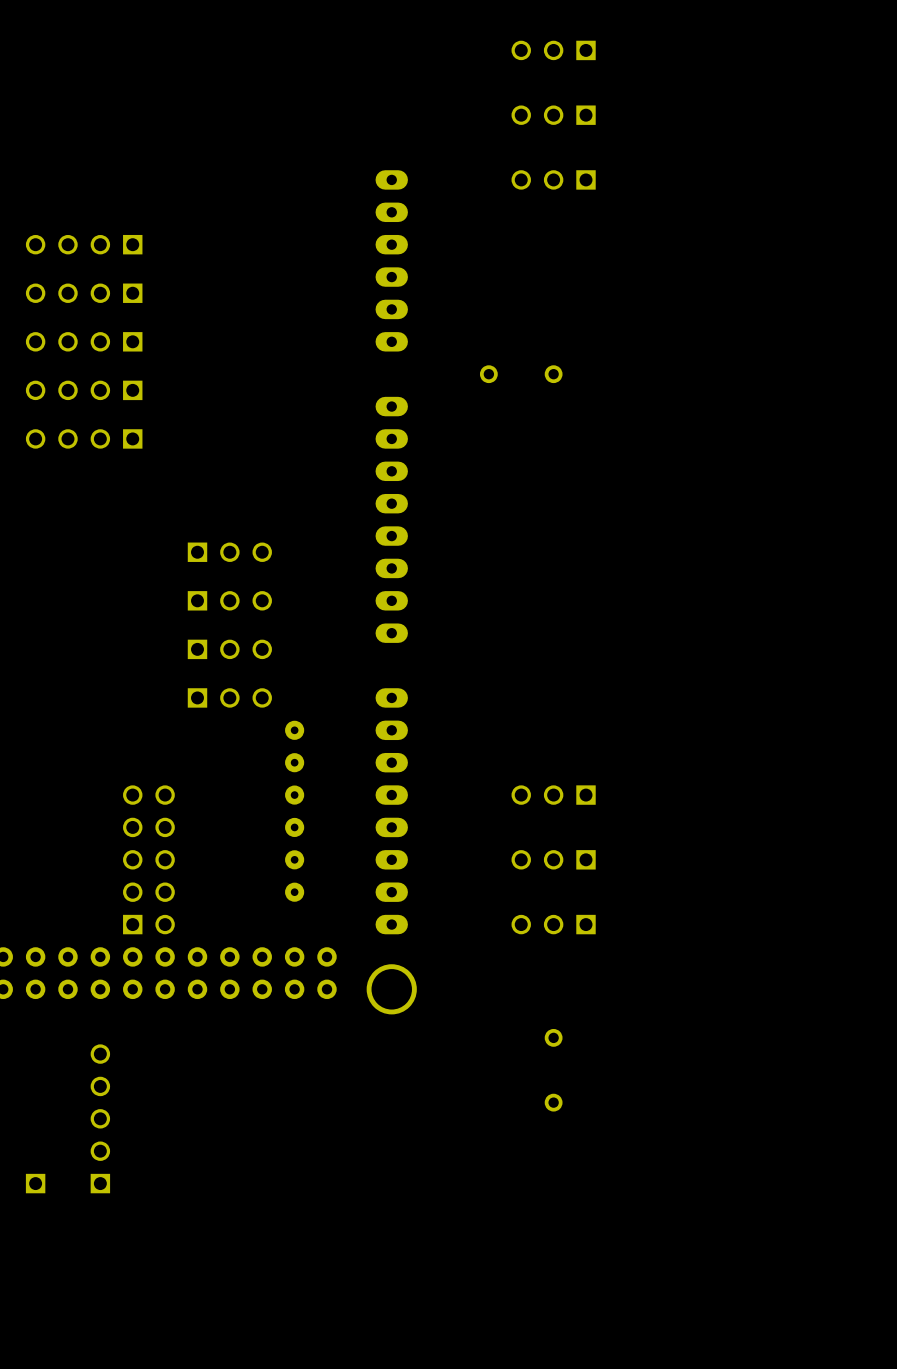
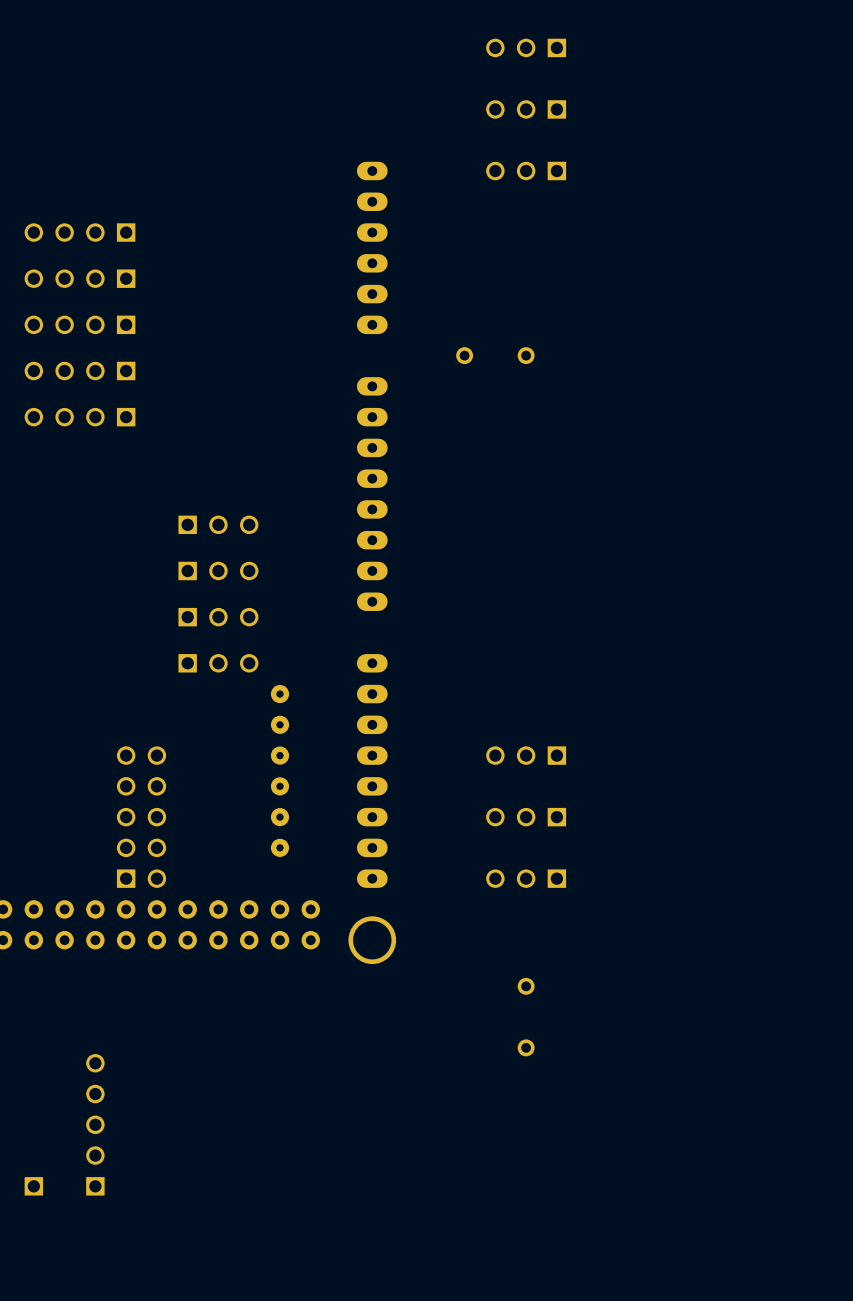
part position: (100, 1118) -> (95, 1124)
part position: (35, 1183) -> (33, 1186)

